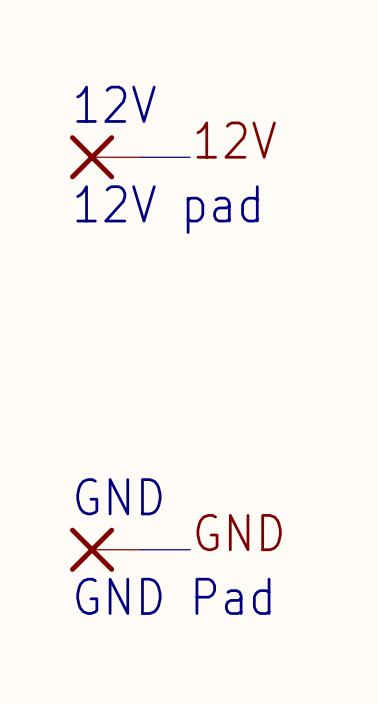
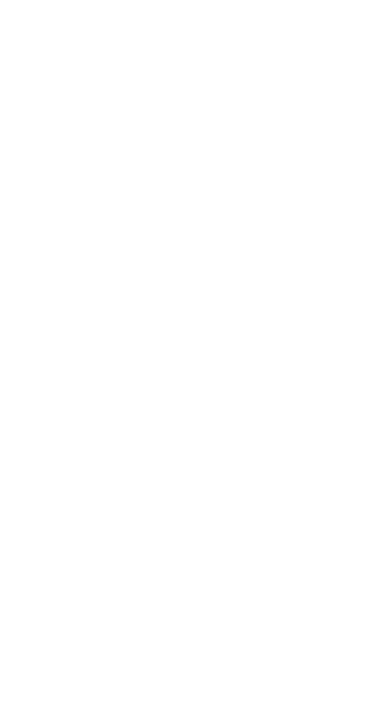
label: 12V (236, 140) -> none
12V: 12V pad (105, 157) -> none
wire: (141, 157) (190, 157) -> none
label: GND (239, 532) -> none
GND: GND Pad (105, 549) -> none
wire: (141, 549) (190, 549) -> none

